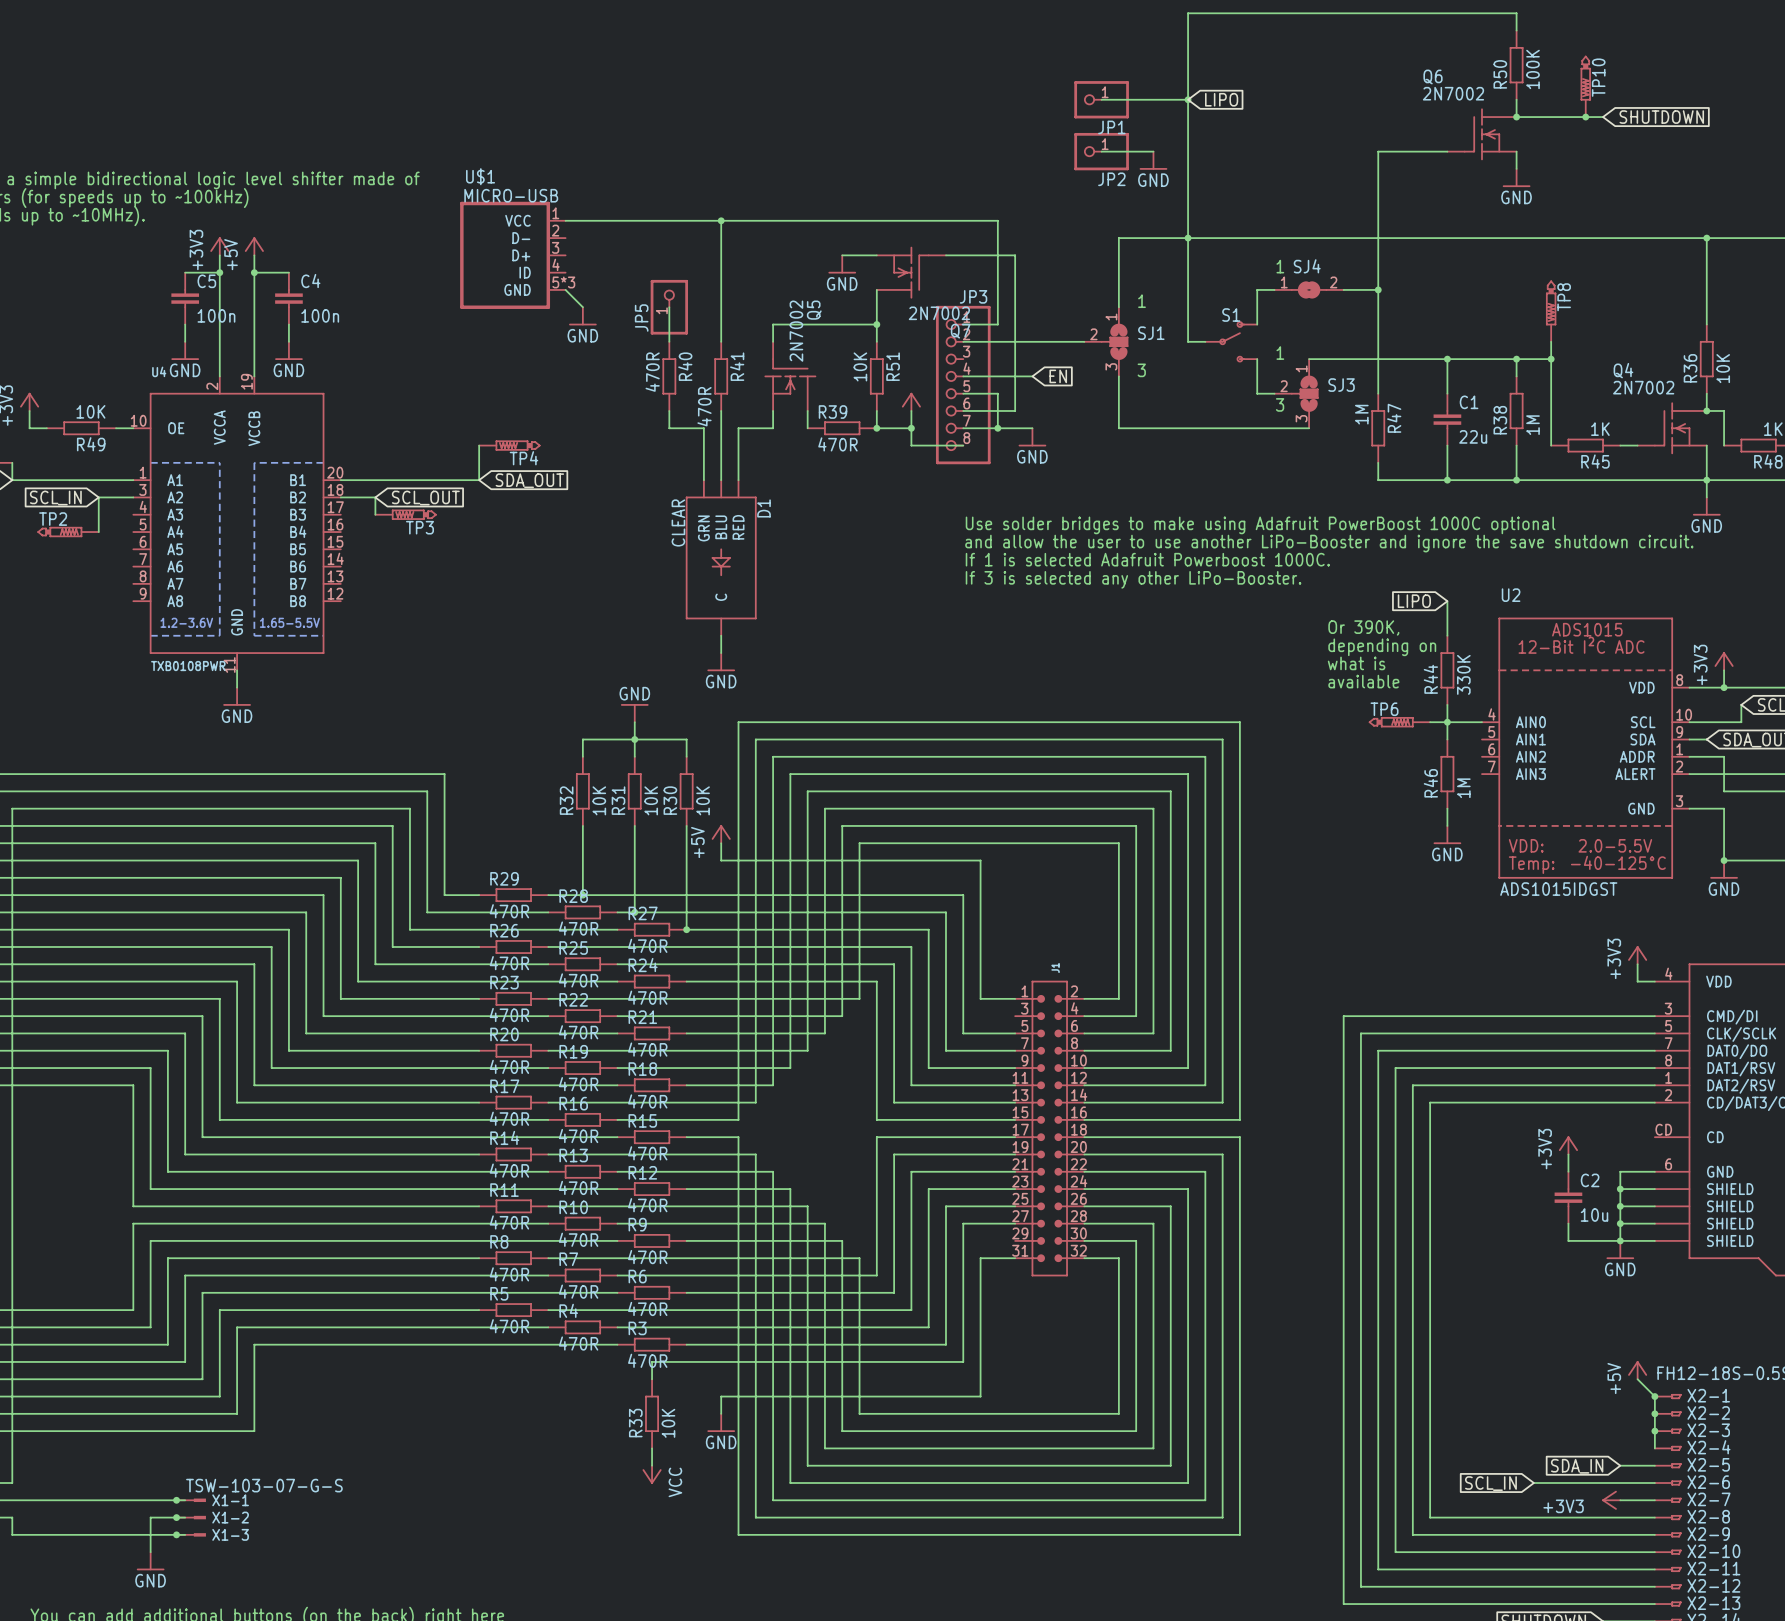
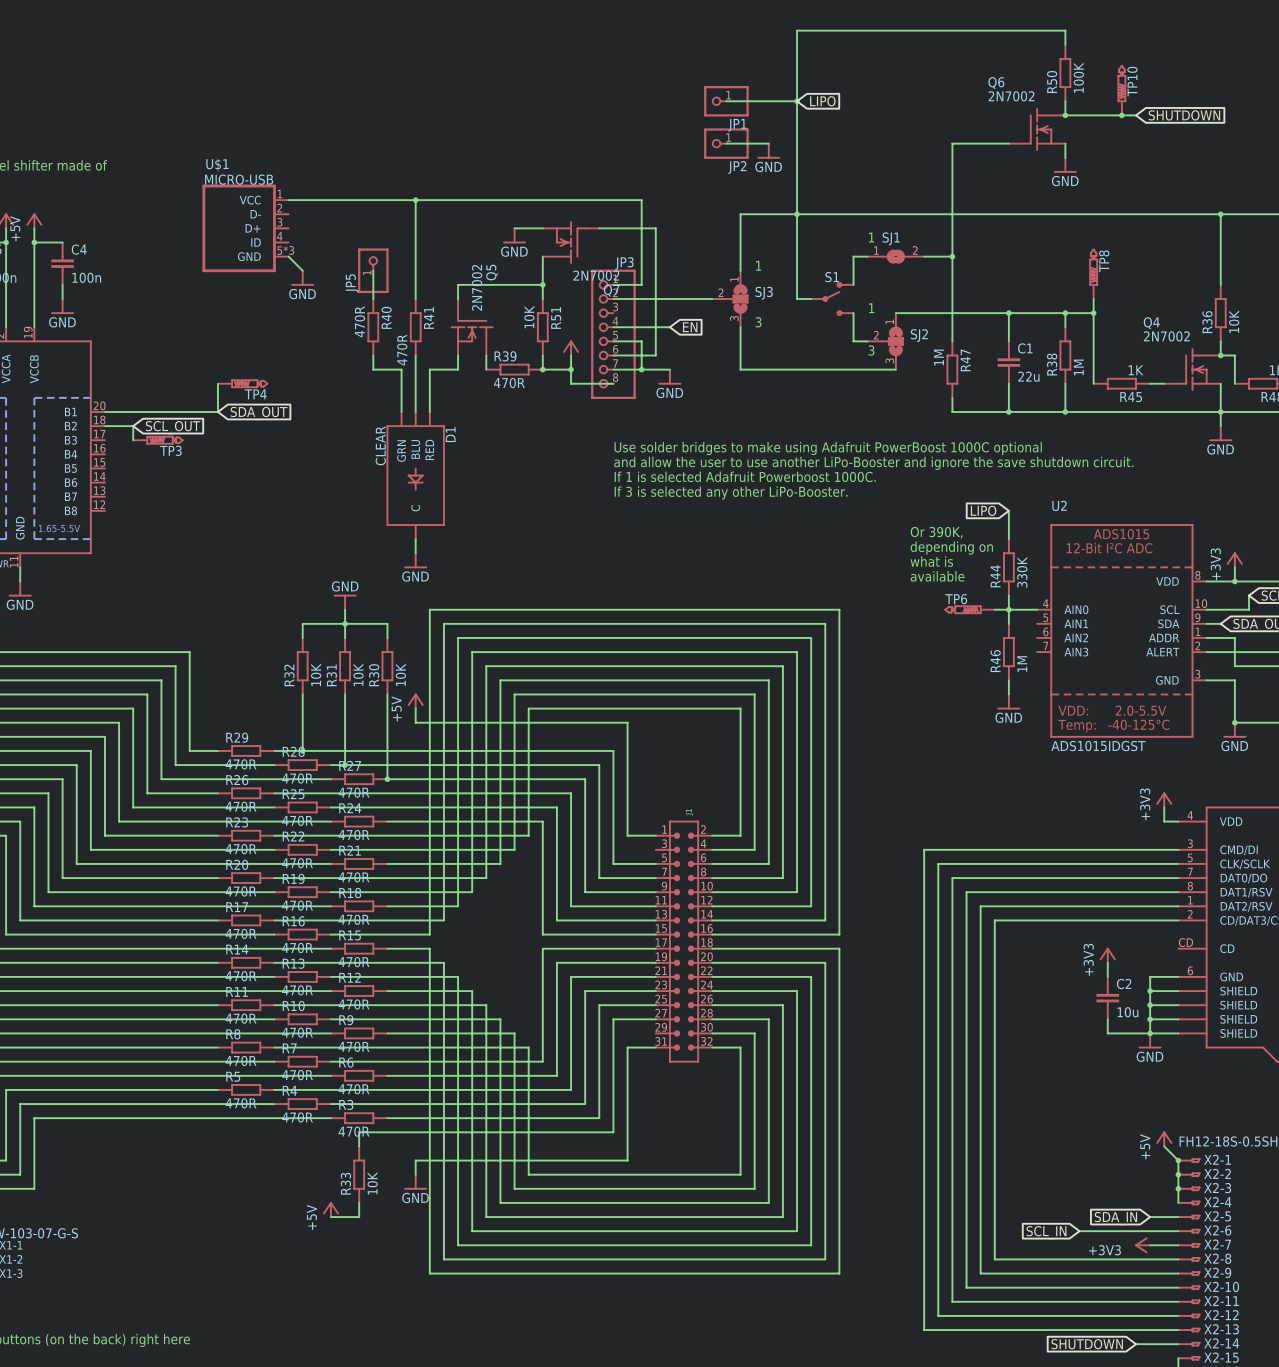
SJ4 name: SJ4 (1307, 266) -> SJ1 (891, 238)
SJ1 name: SJ1 (1151, 333) -> SJ3 (764, 293)
SJ3 name: SJ3 (1341, 385) -> SJ2 (919, 335)
power symbol: none -> +5V (330, 1209)
wire: none -> (330, 1217) (359, 1217)
power symbol: VCC (652, 1474) -> none

